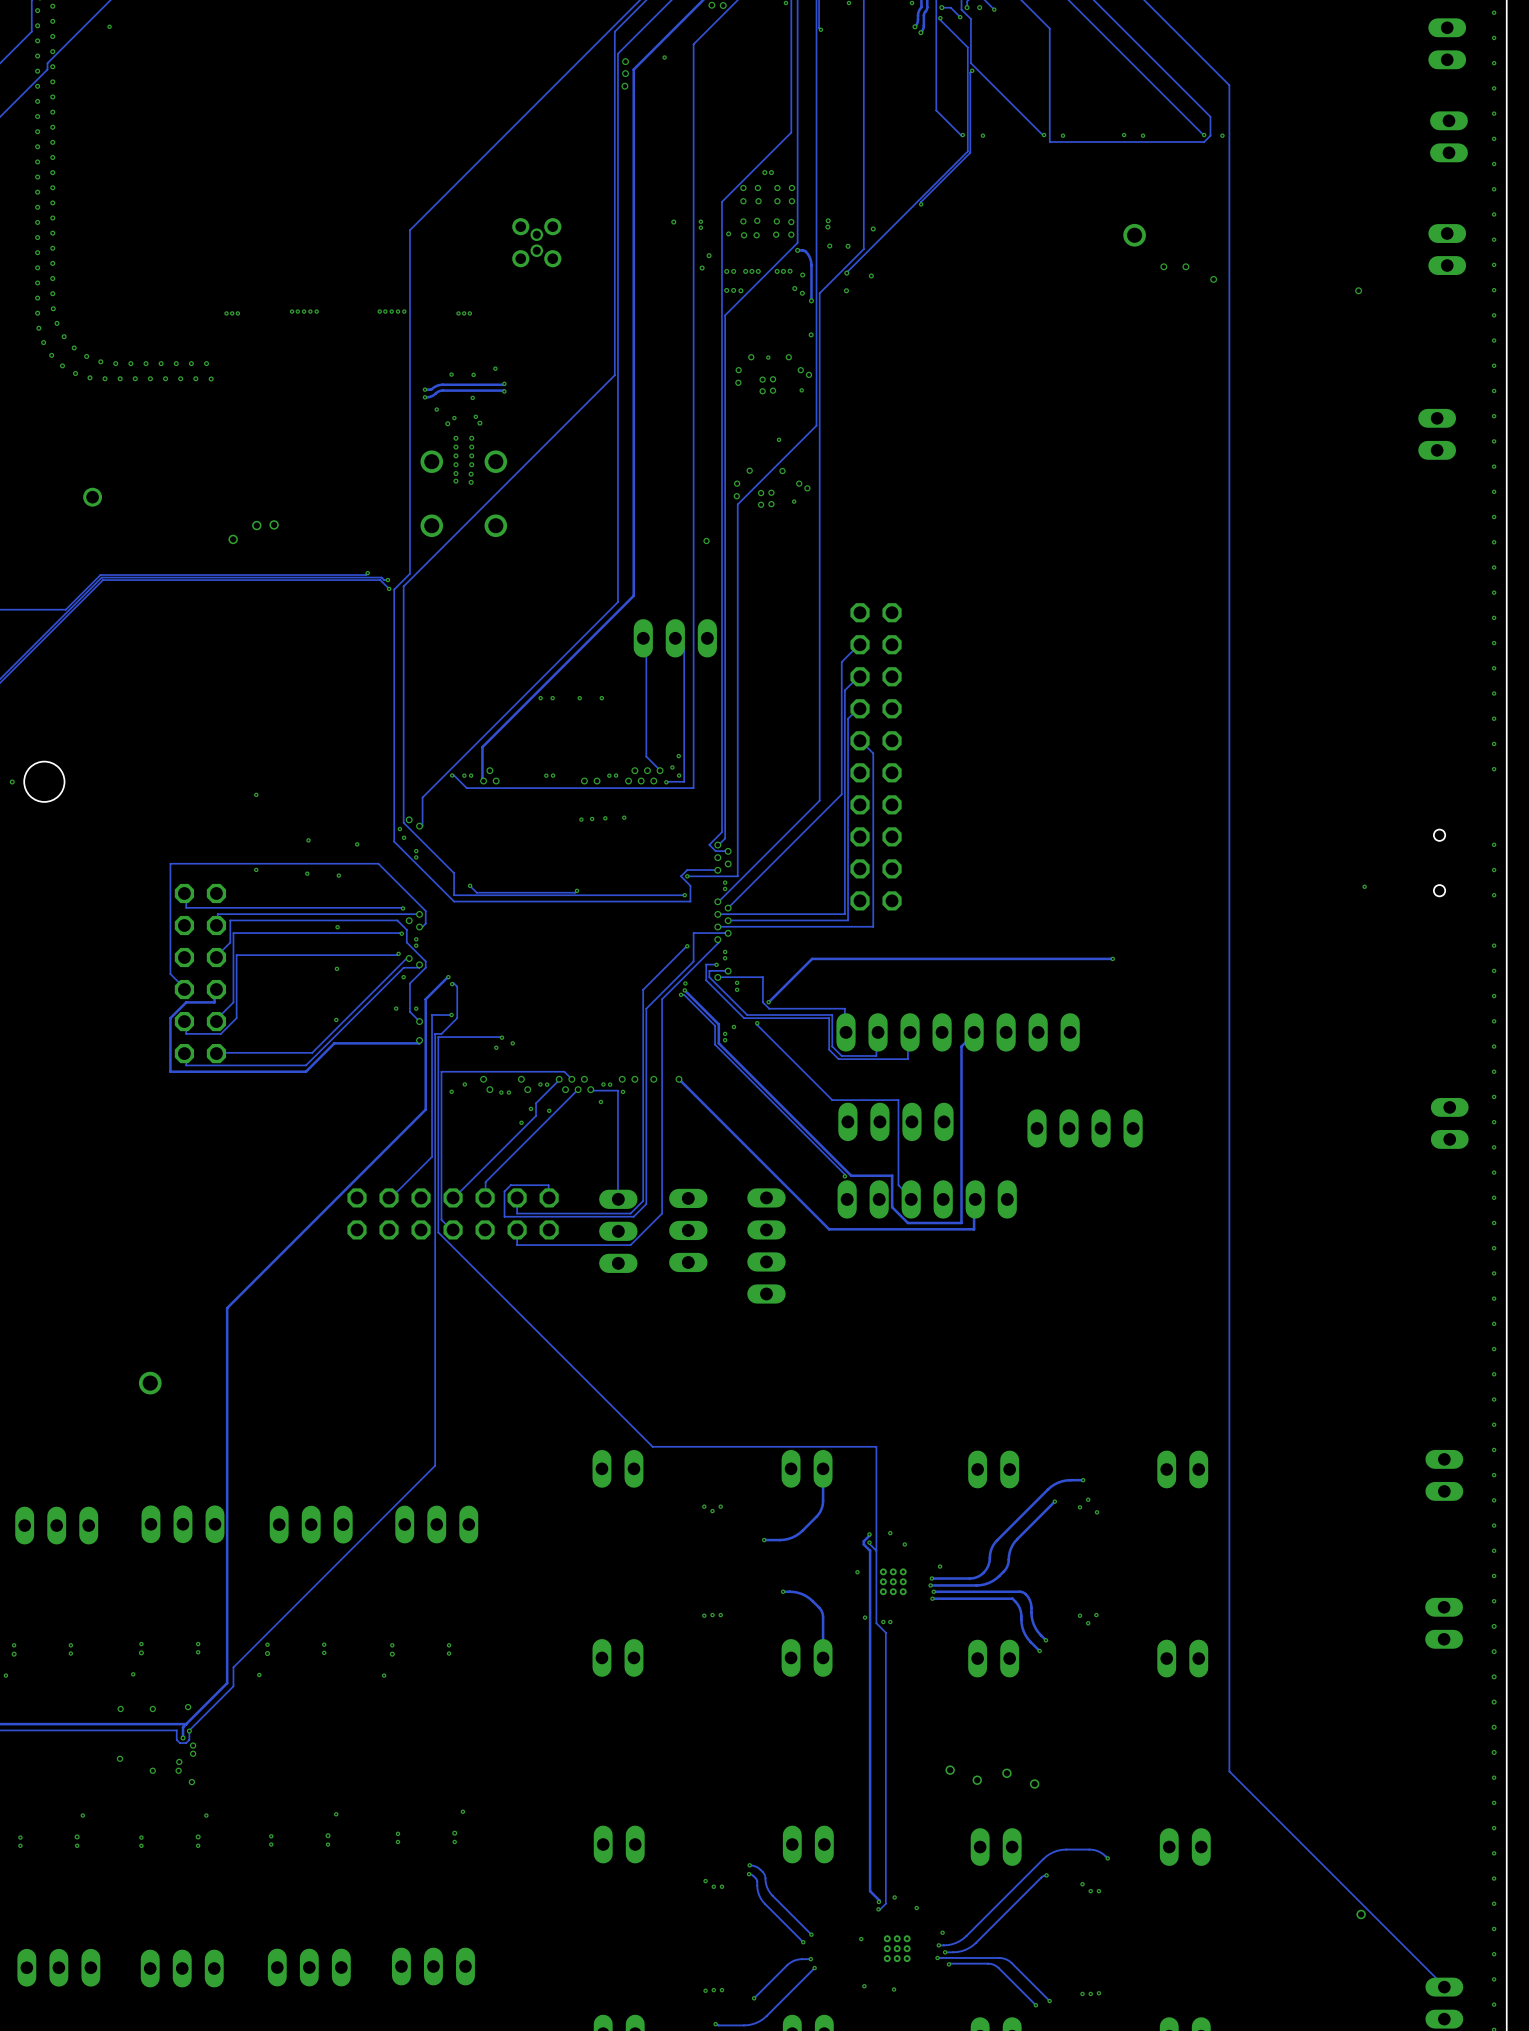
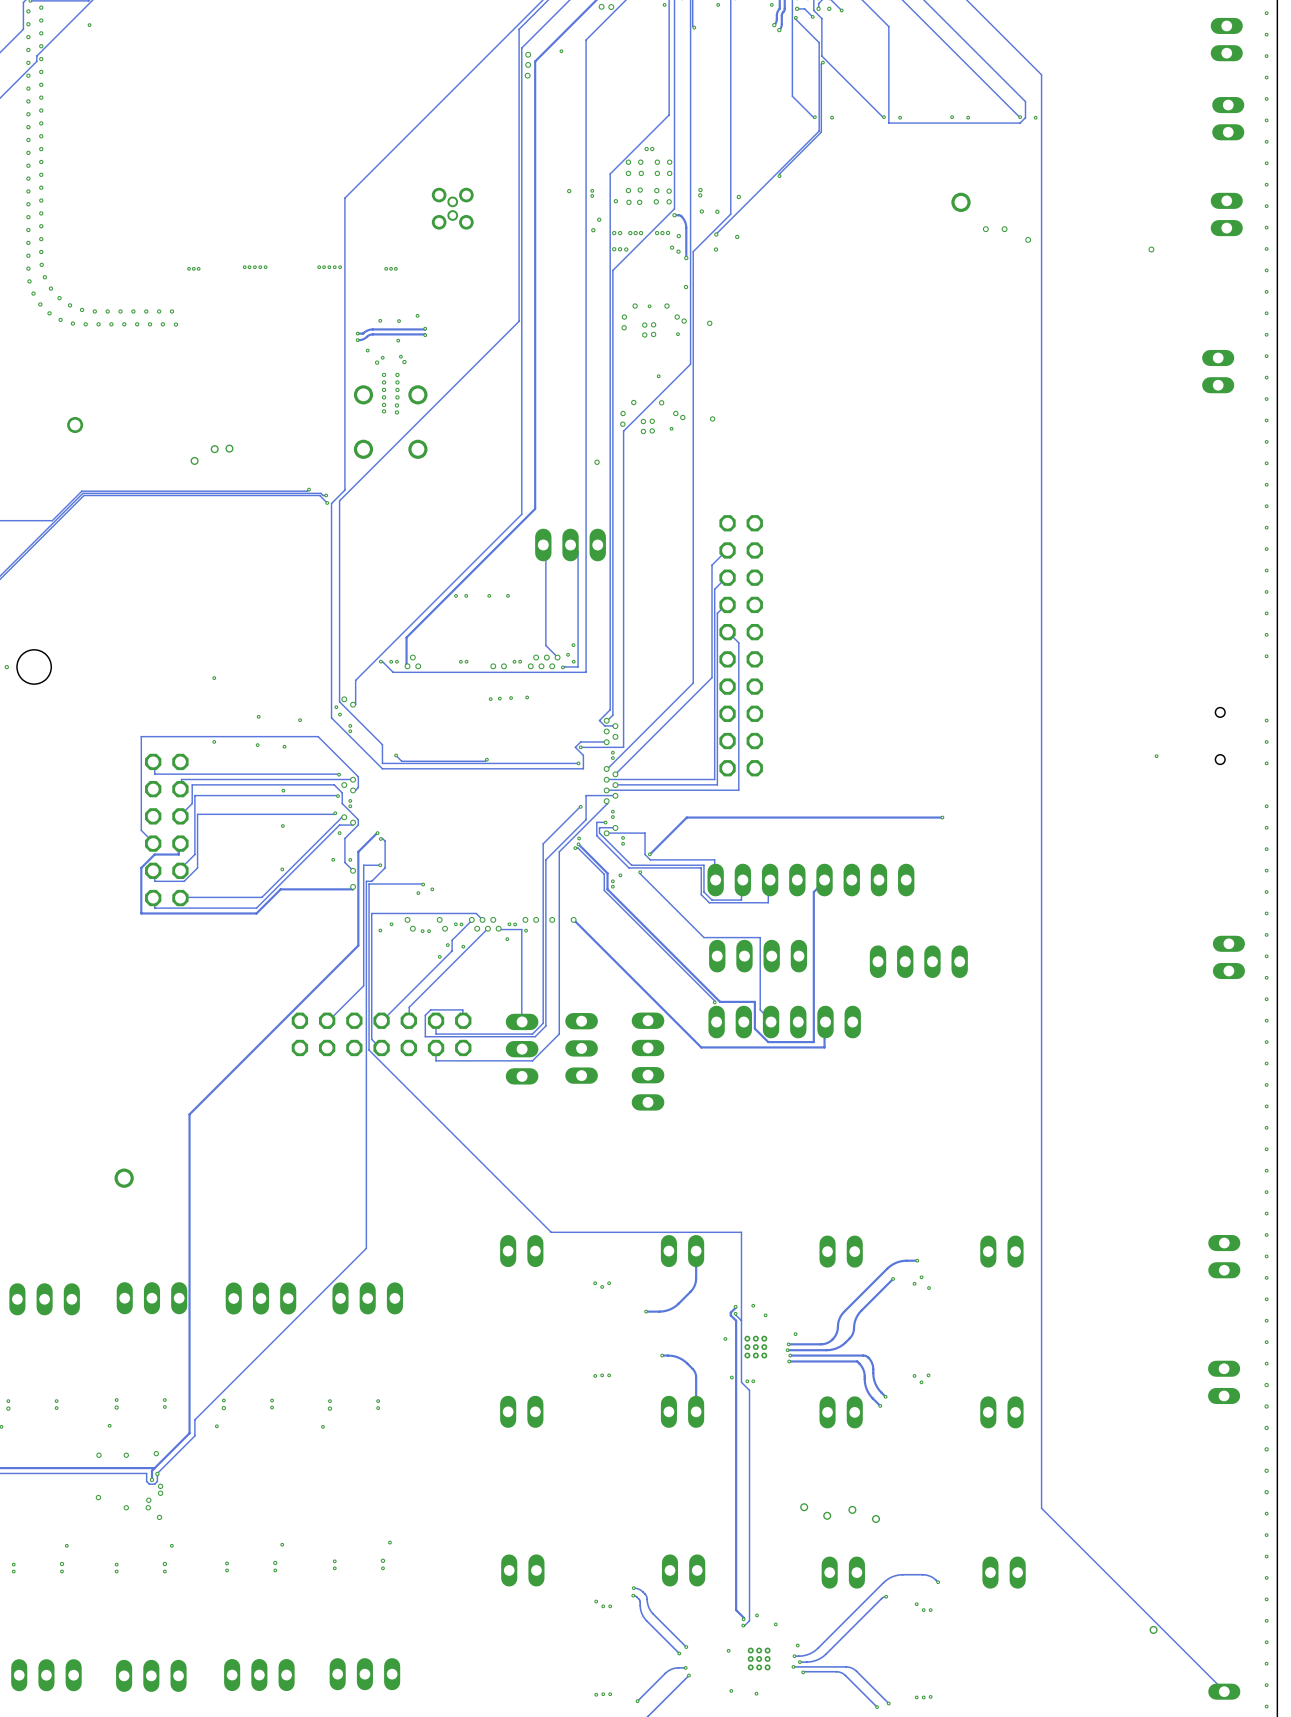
via: none -> (709, 323)
via: none -> (712, 418)

